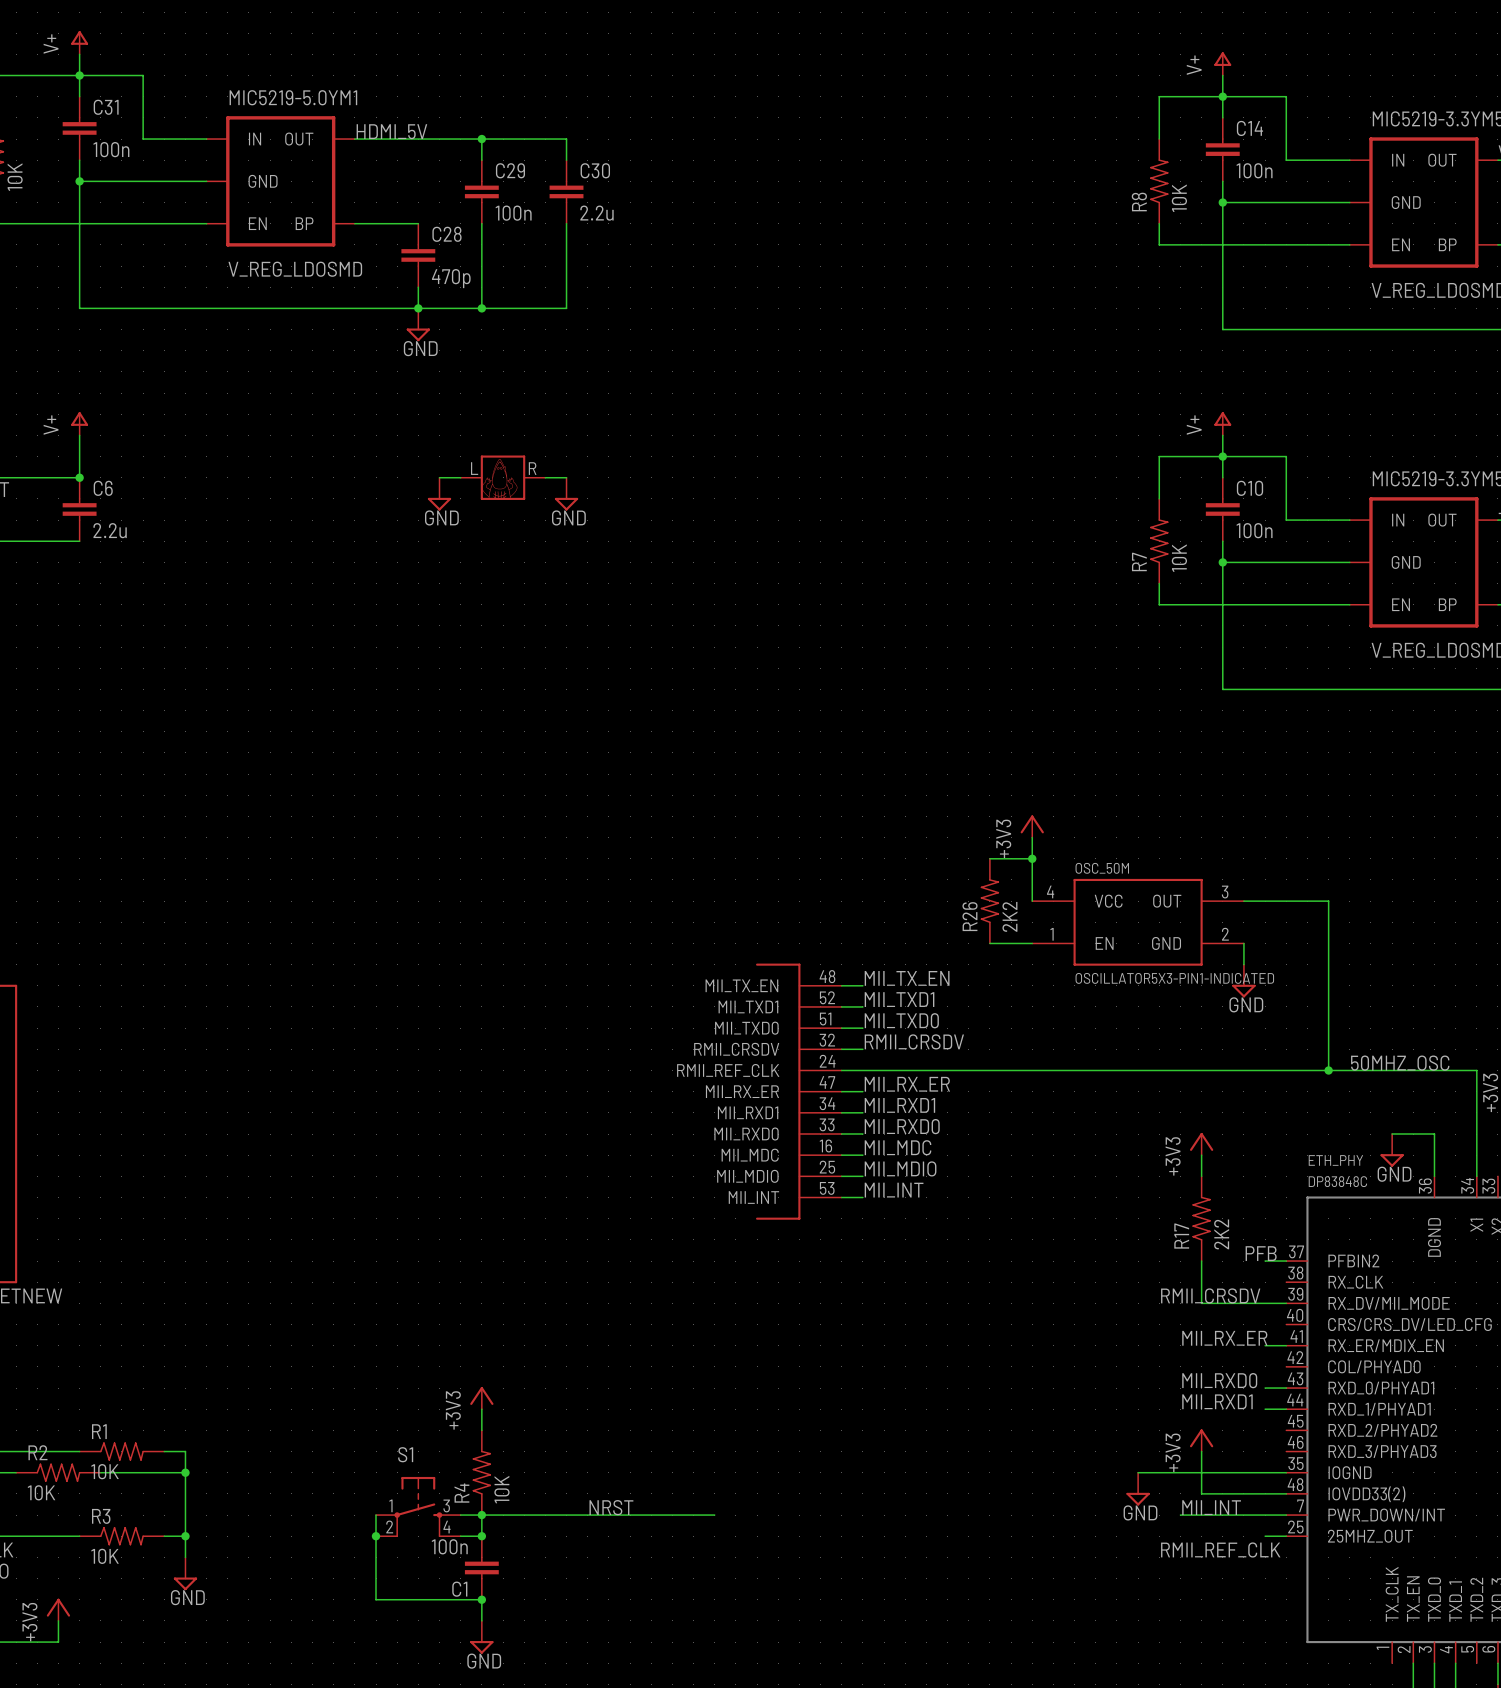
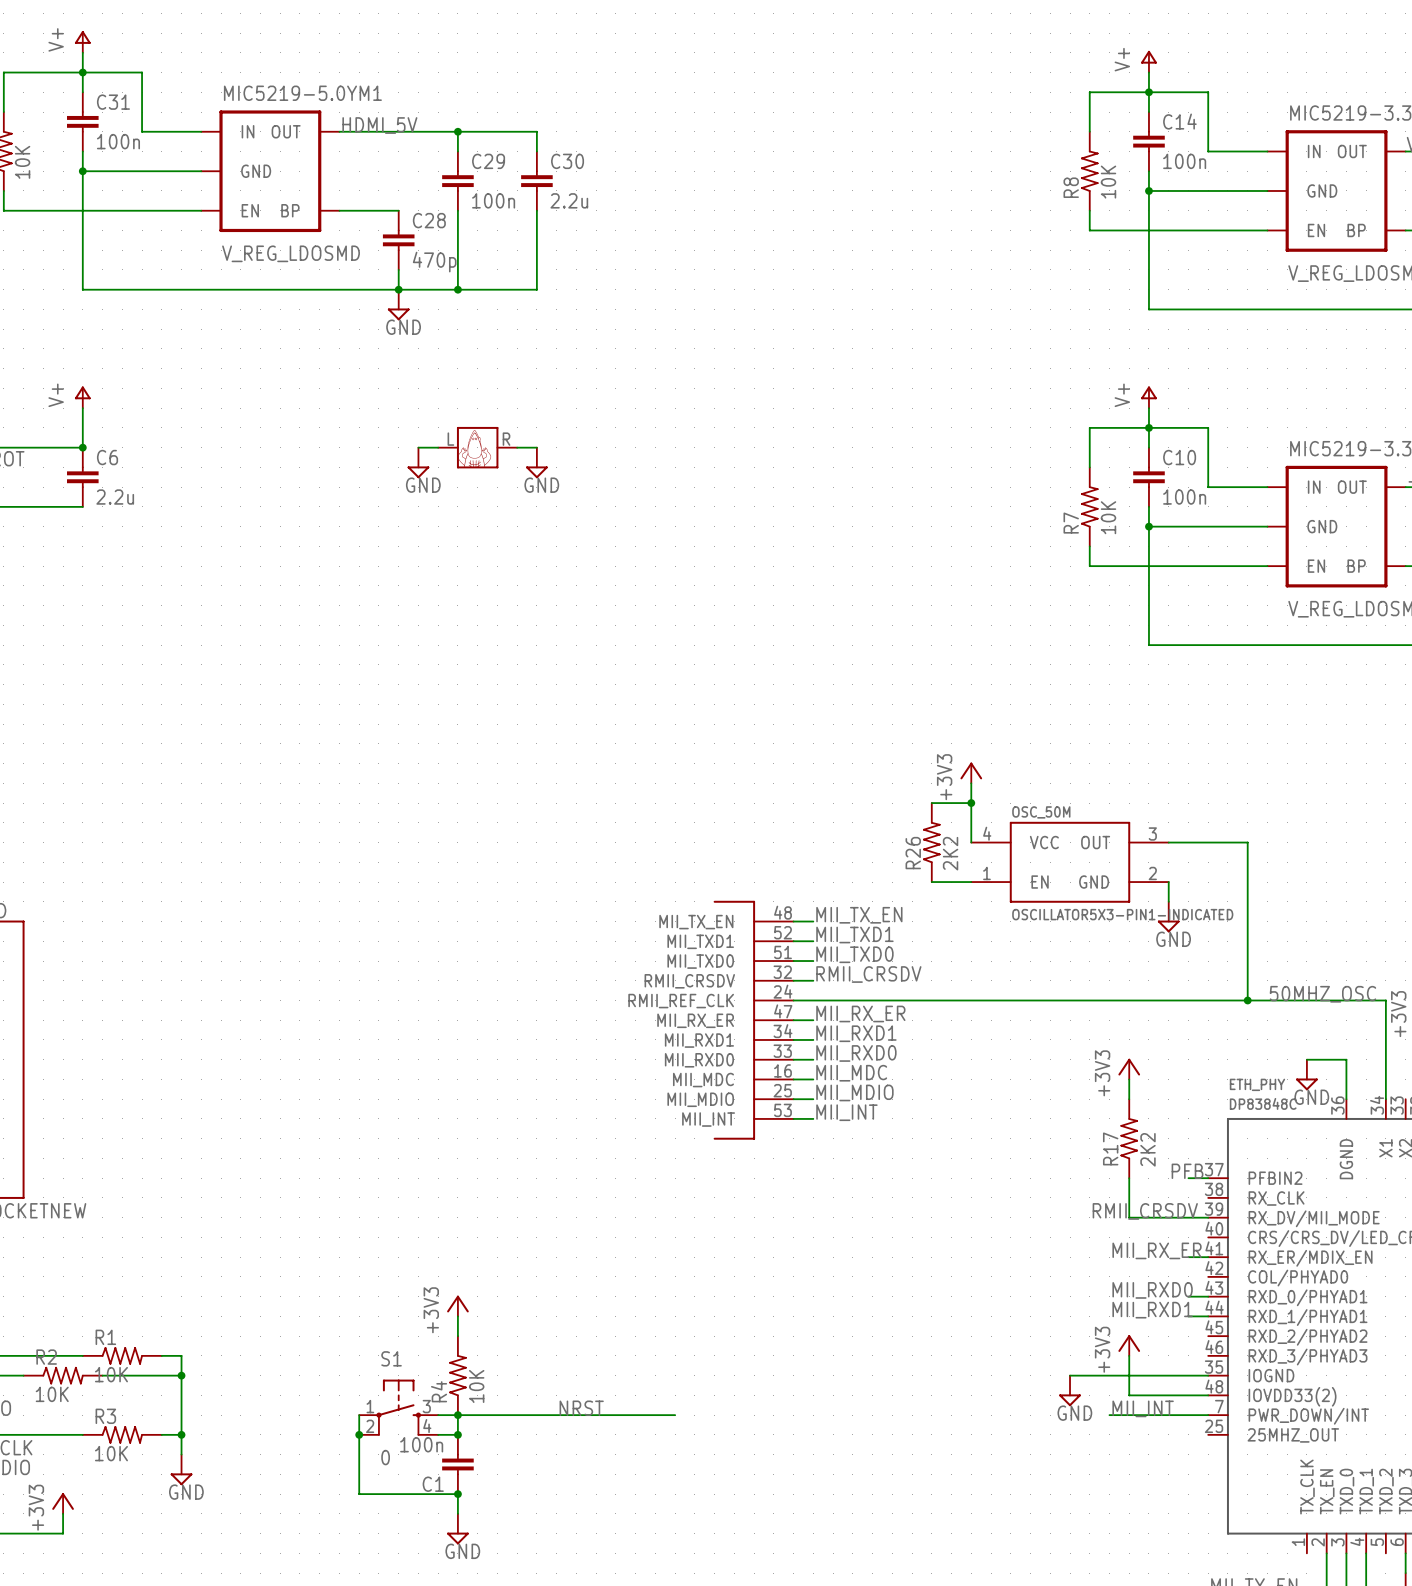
wire: (1265, 1536) (1286, 1536) -> none
label: RMII_REF_CLK (1220, 1549) -> none
S1 value: none -> 0 (385, 1457)

